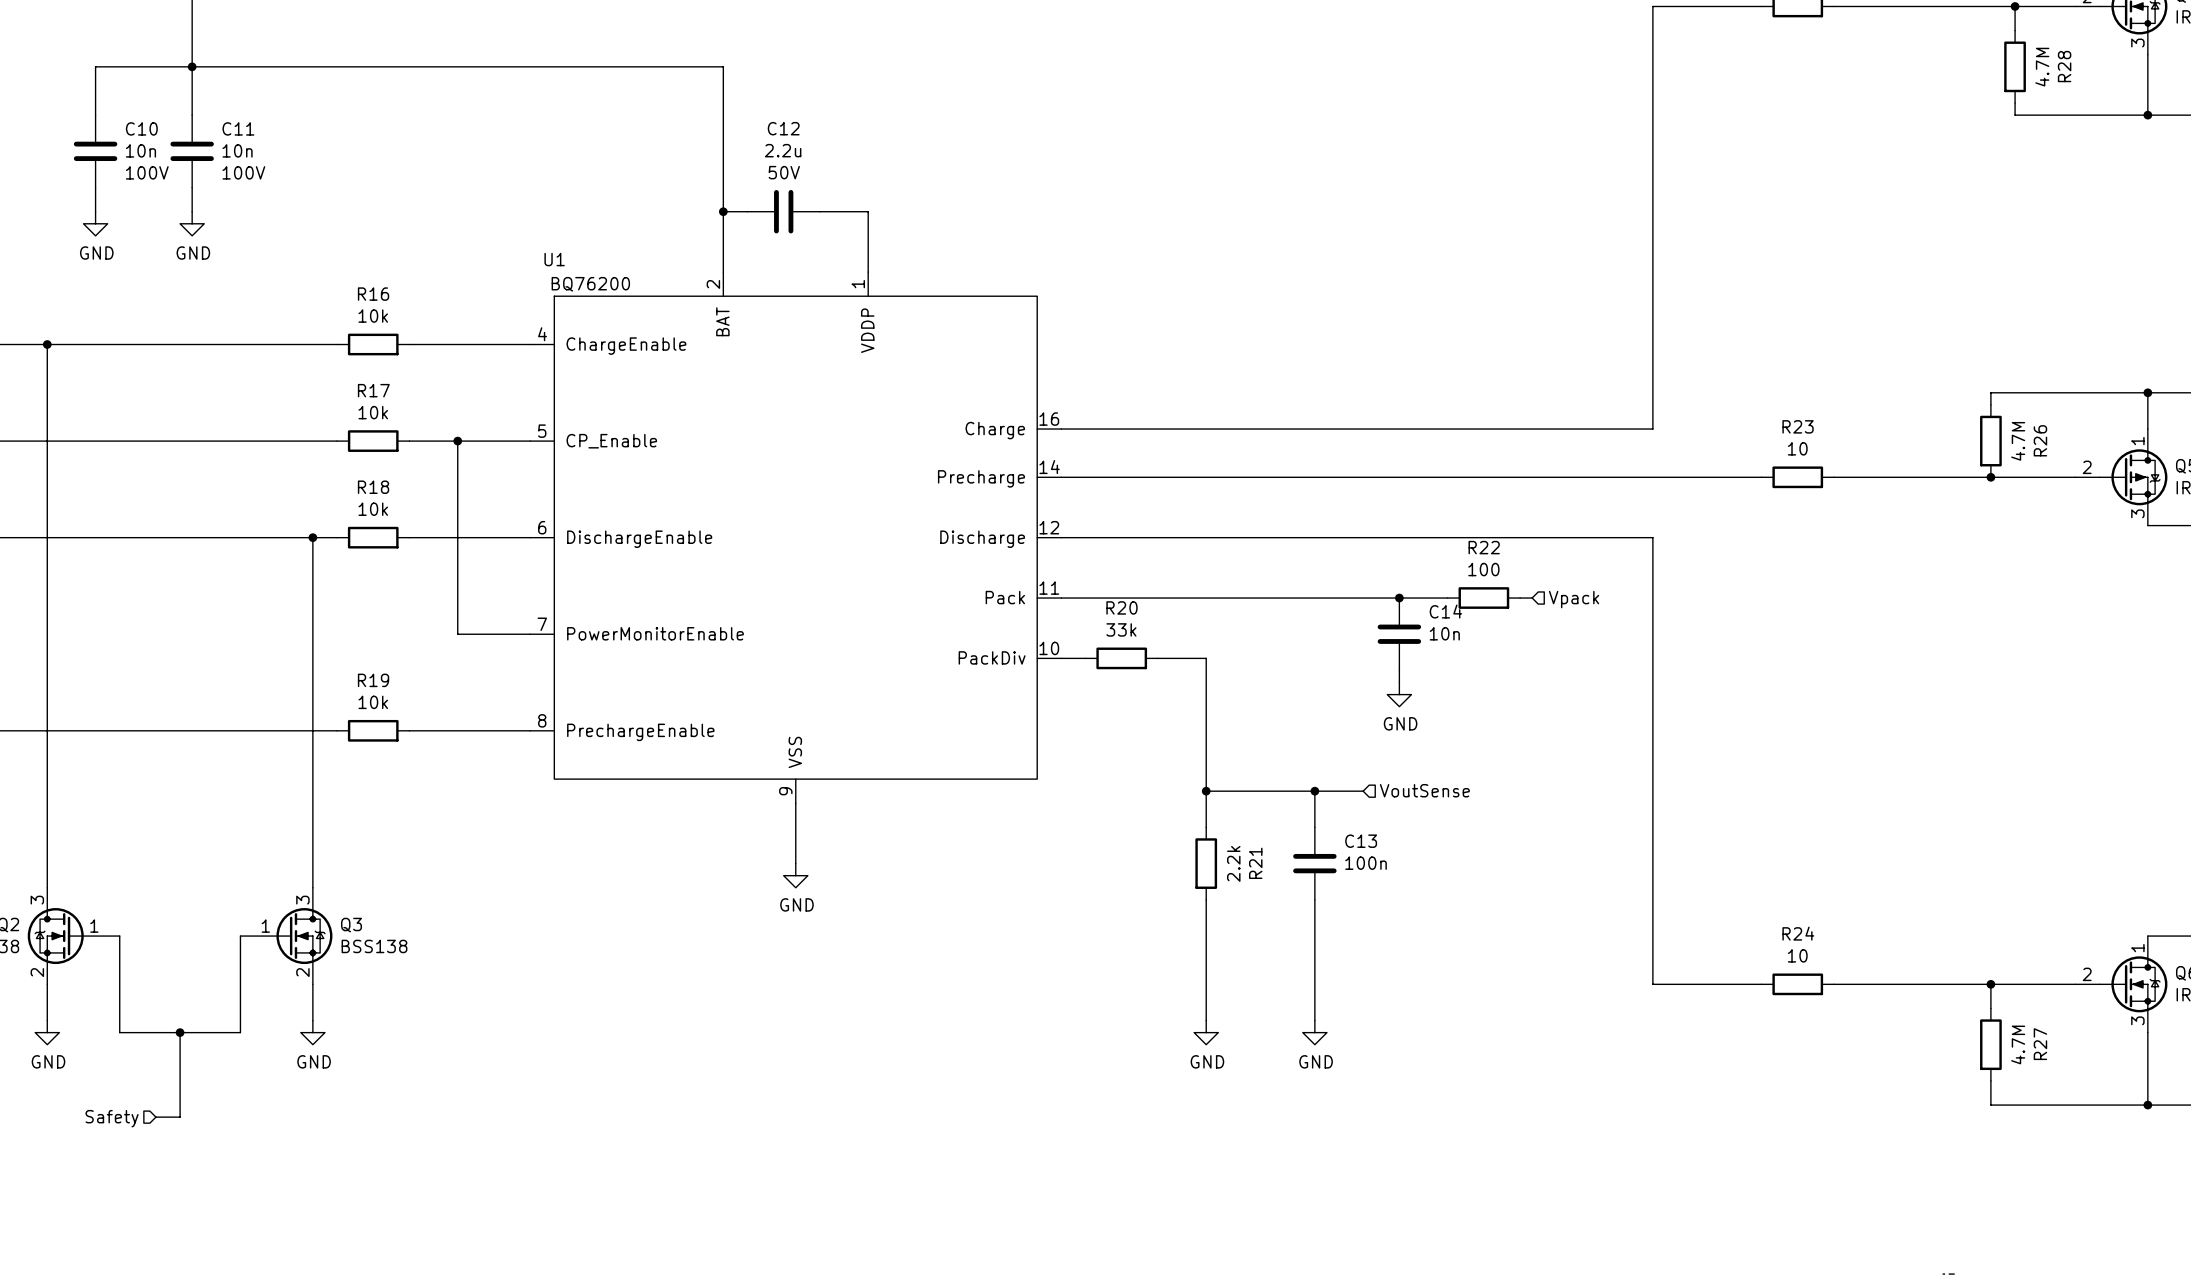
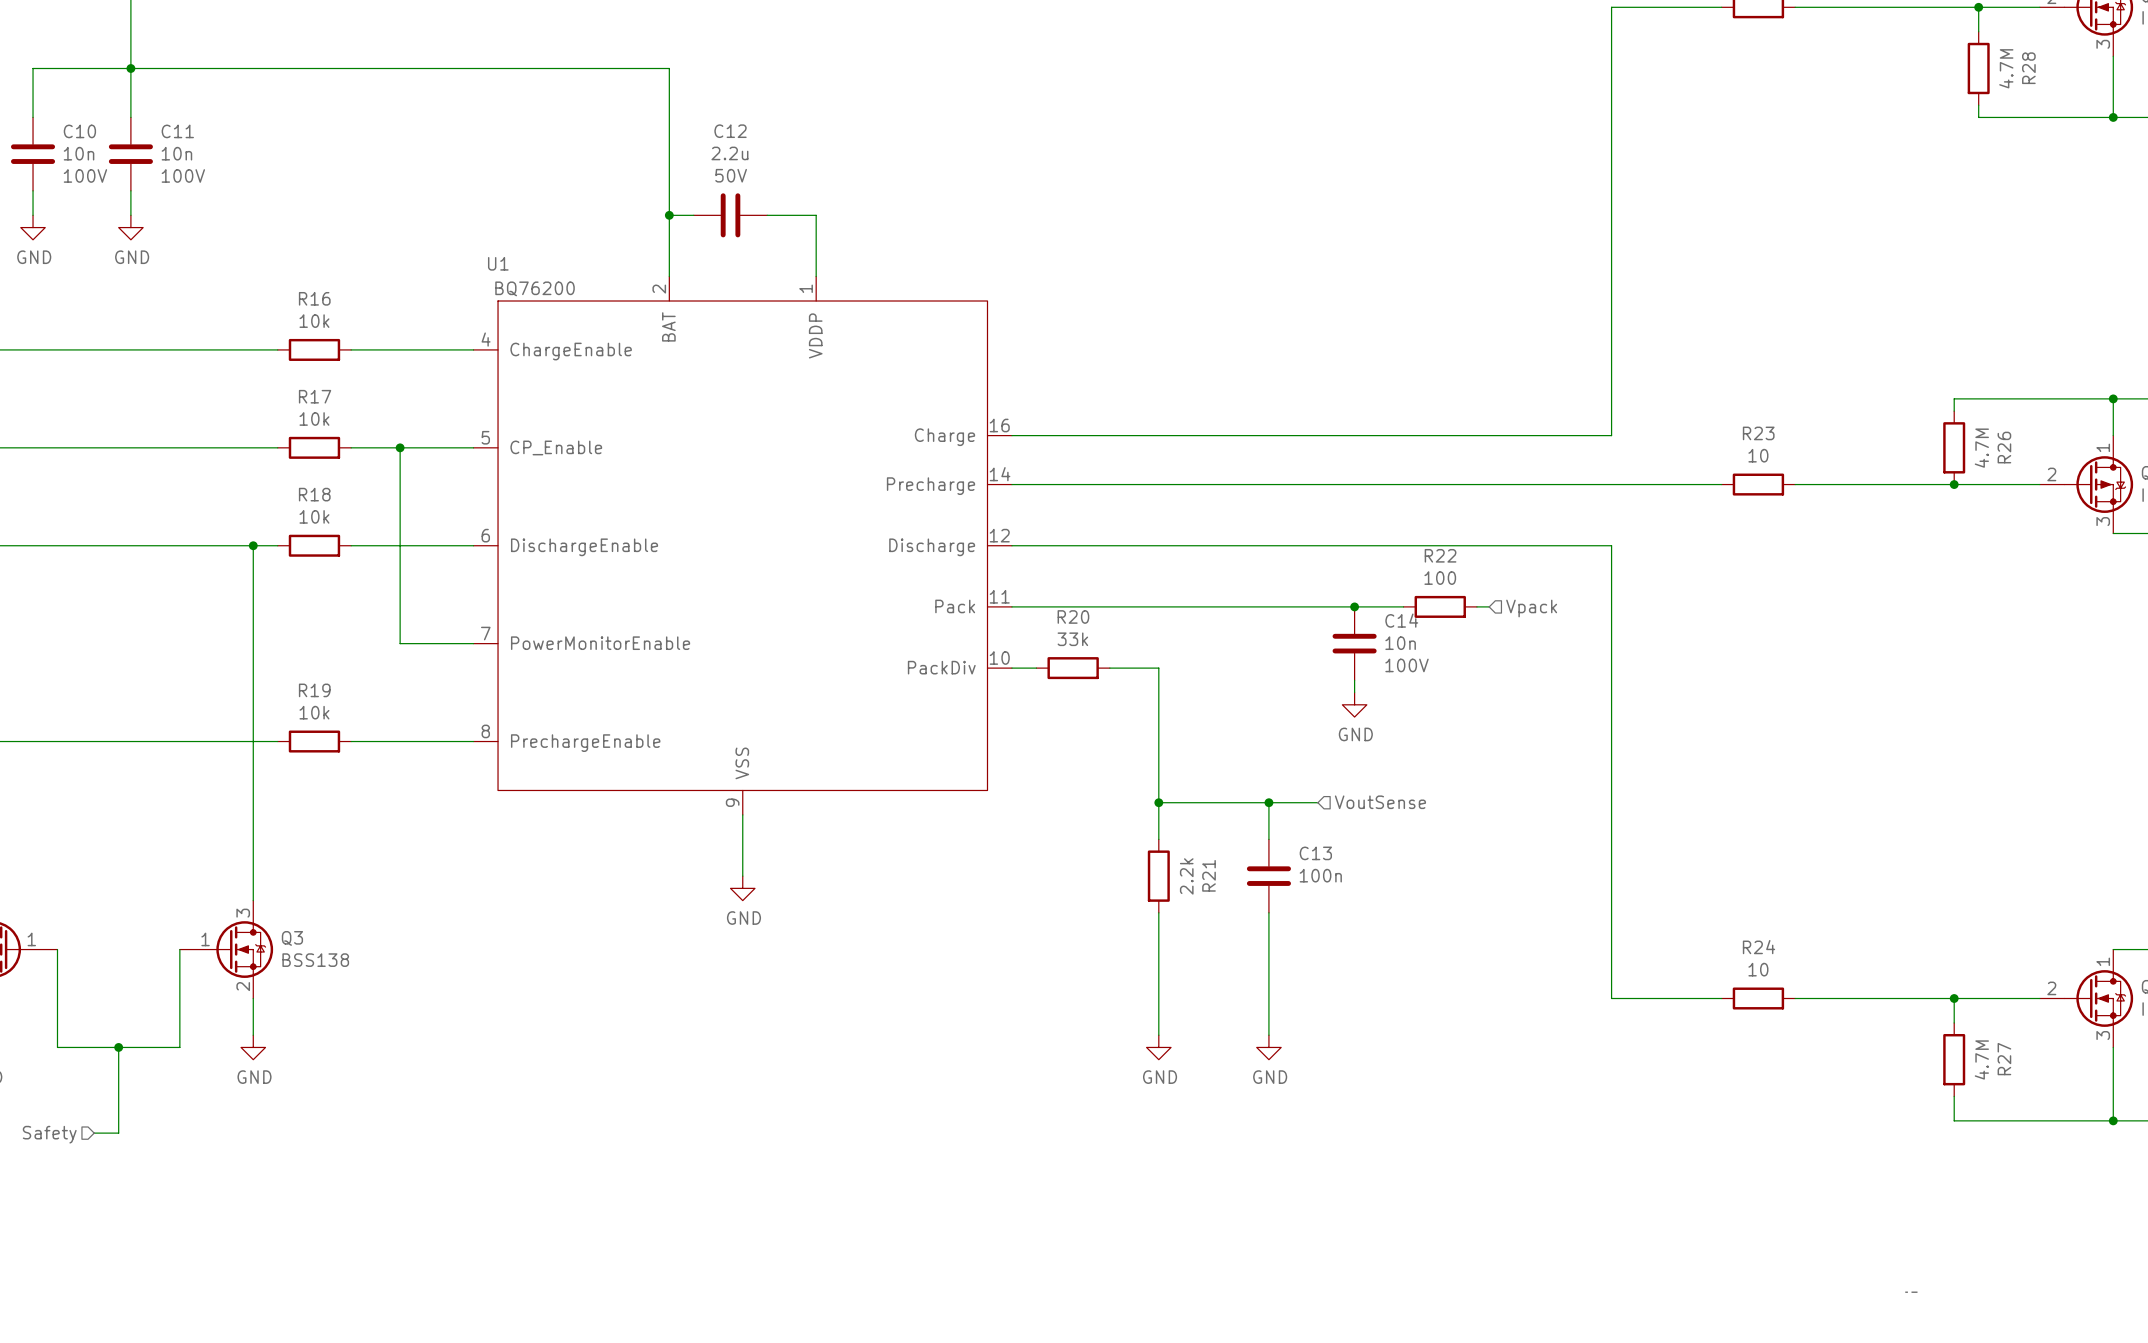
C14 text: none -> 100V (1407, 665)

